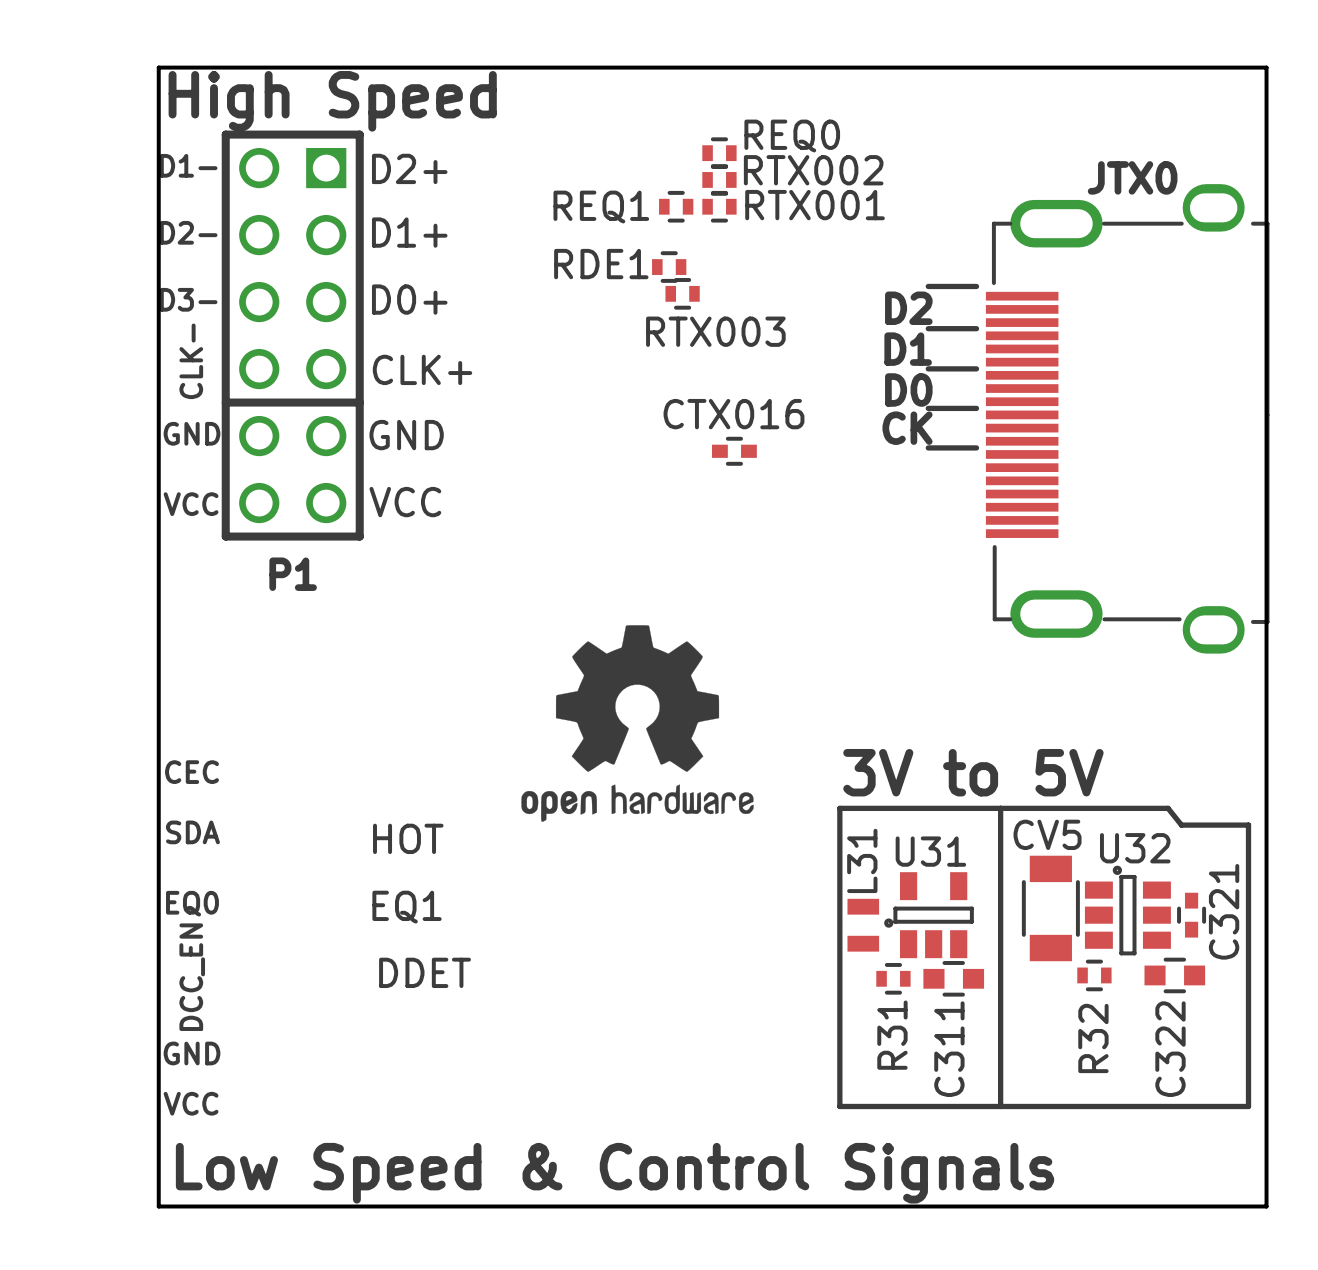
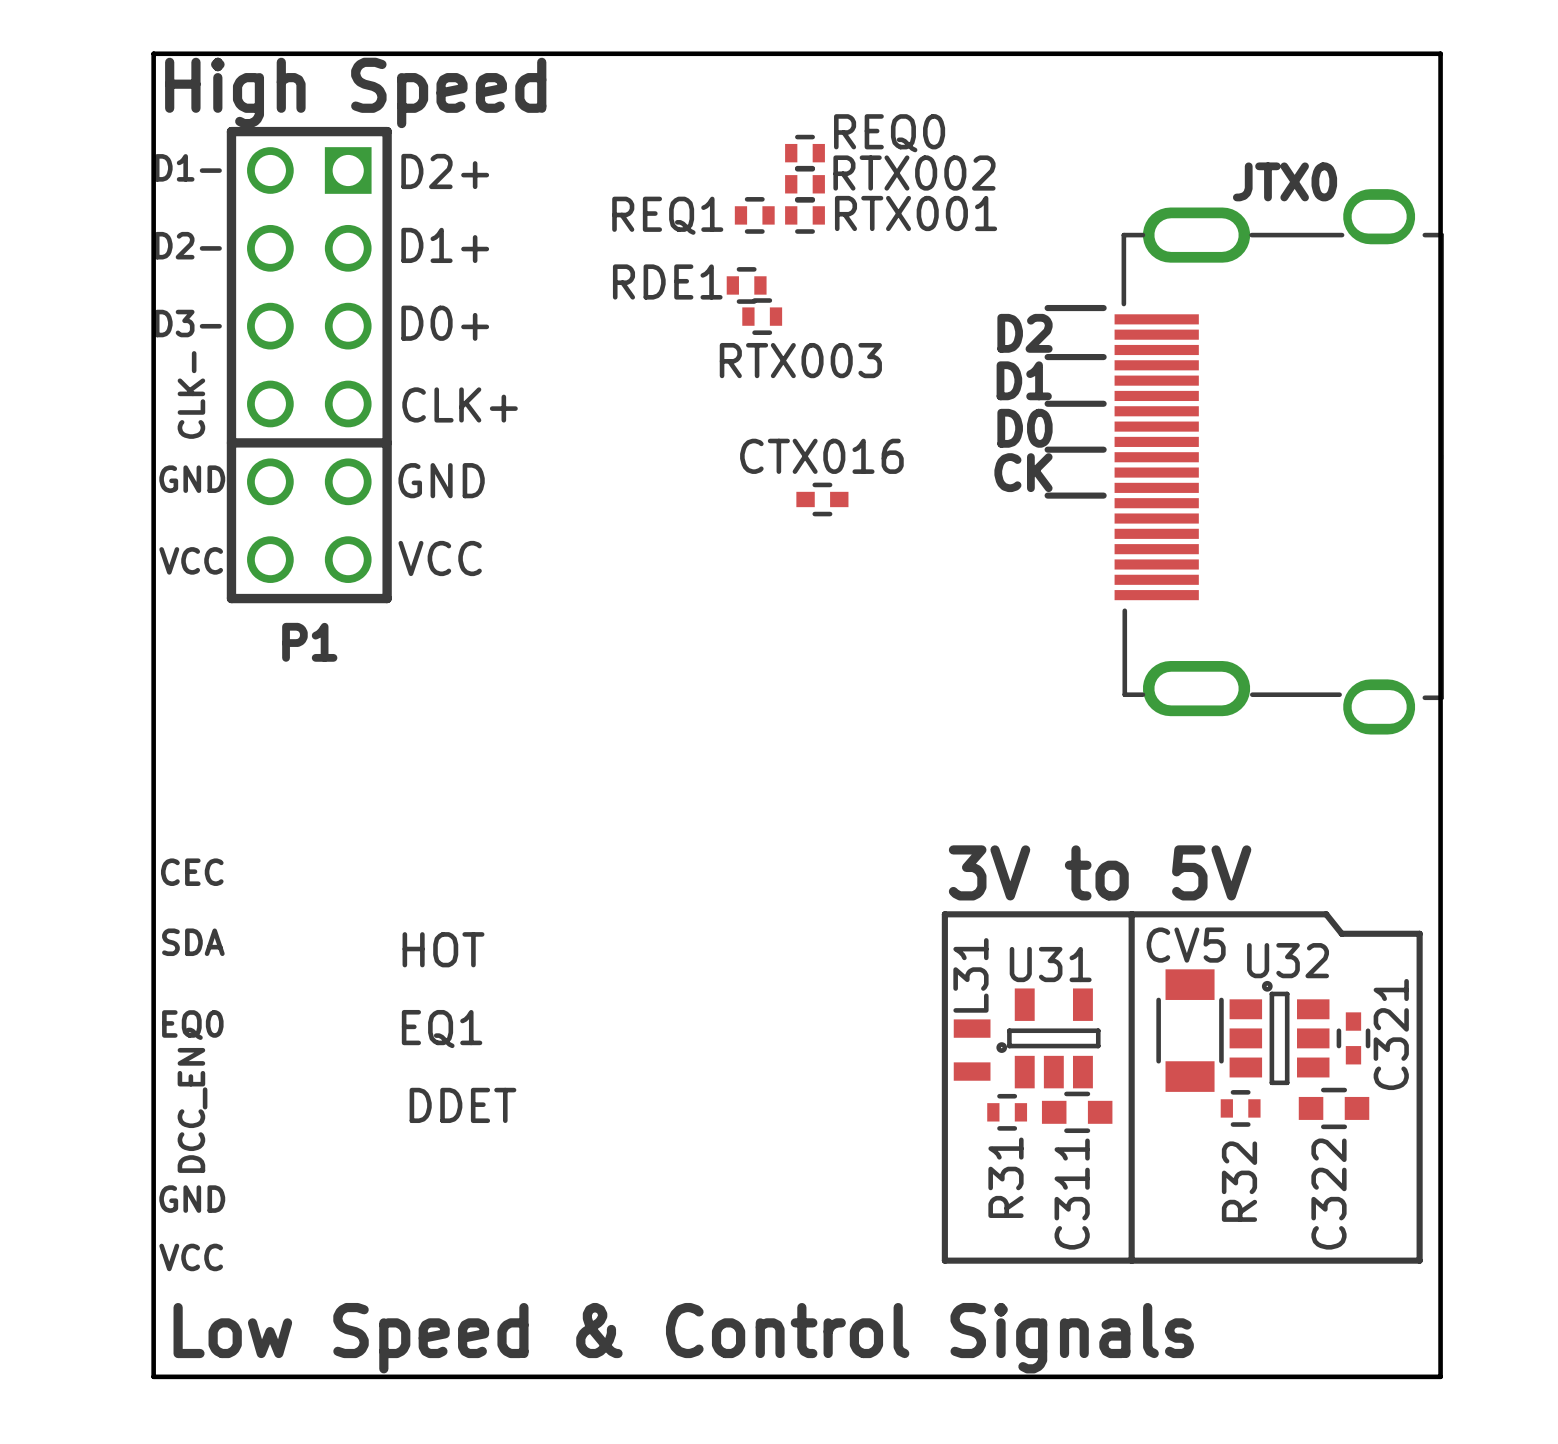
drawing: [521, 625, 754, 822] -> none

